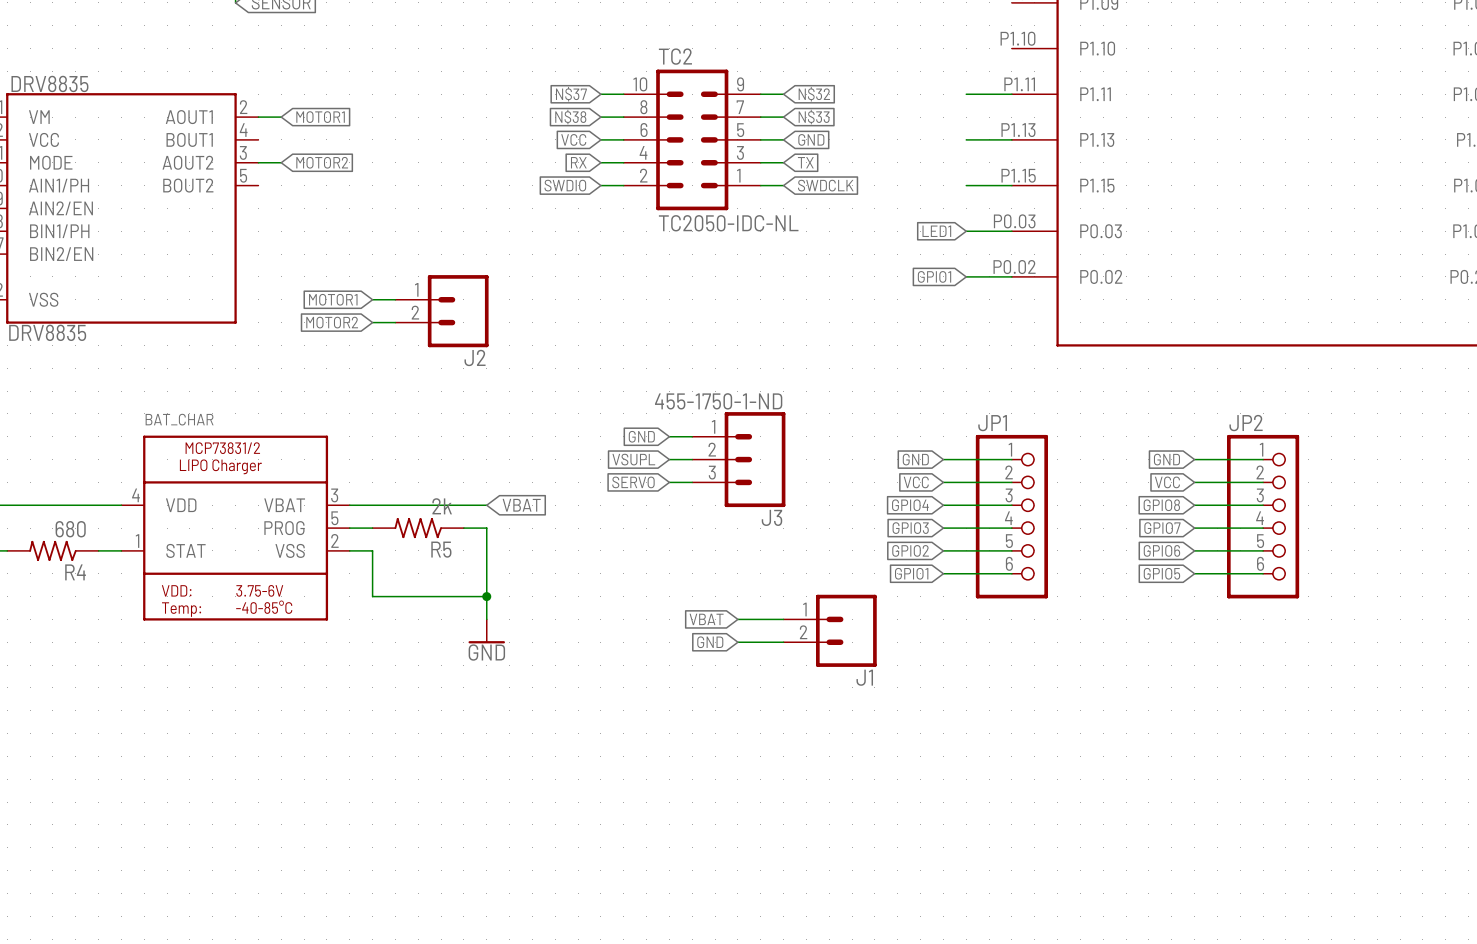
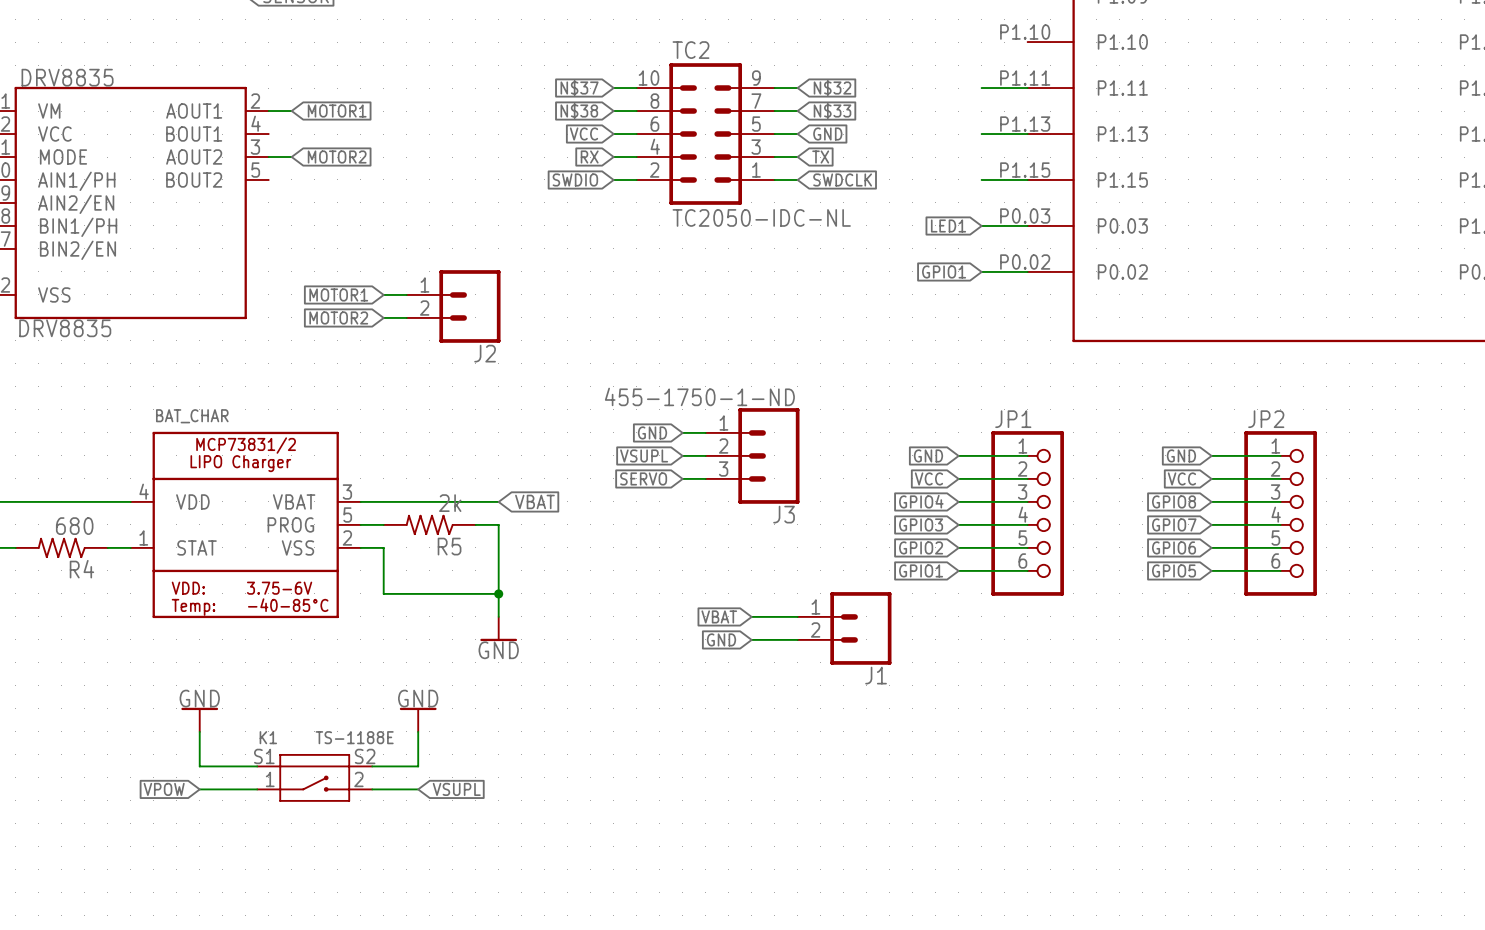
power symbol: none -> GND (199, 719)
power symbol: none -> GND (418, 719)
wire: none -> (199, 731) (199, 766) (257, 766)
wire: none -> (418, 731) (418, 766) (372, 766)
K1: none -> TS-1188E (314, 777)
global label: none -> VPOW (164, 789)
wire: none -> (199, 789) (257, 789)
wire: none -> (372, 789) (418, 789)
global label: none -> VSUPL (456, 789)

